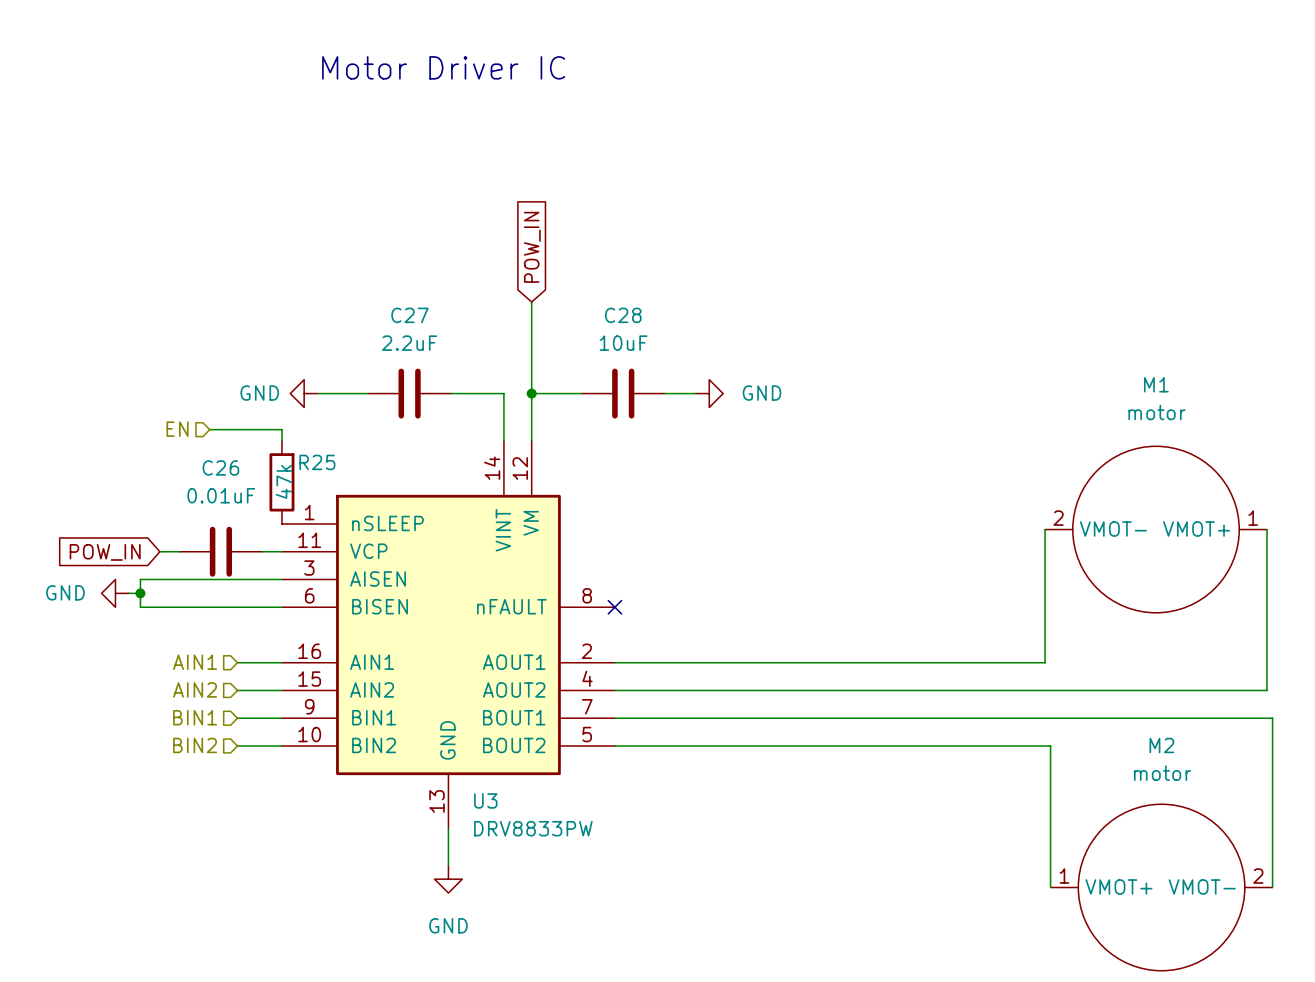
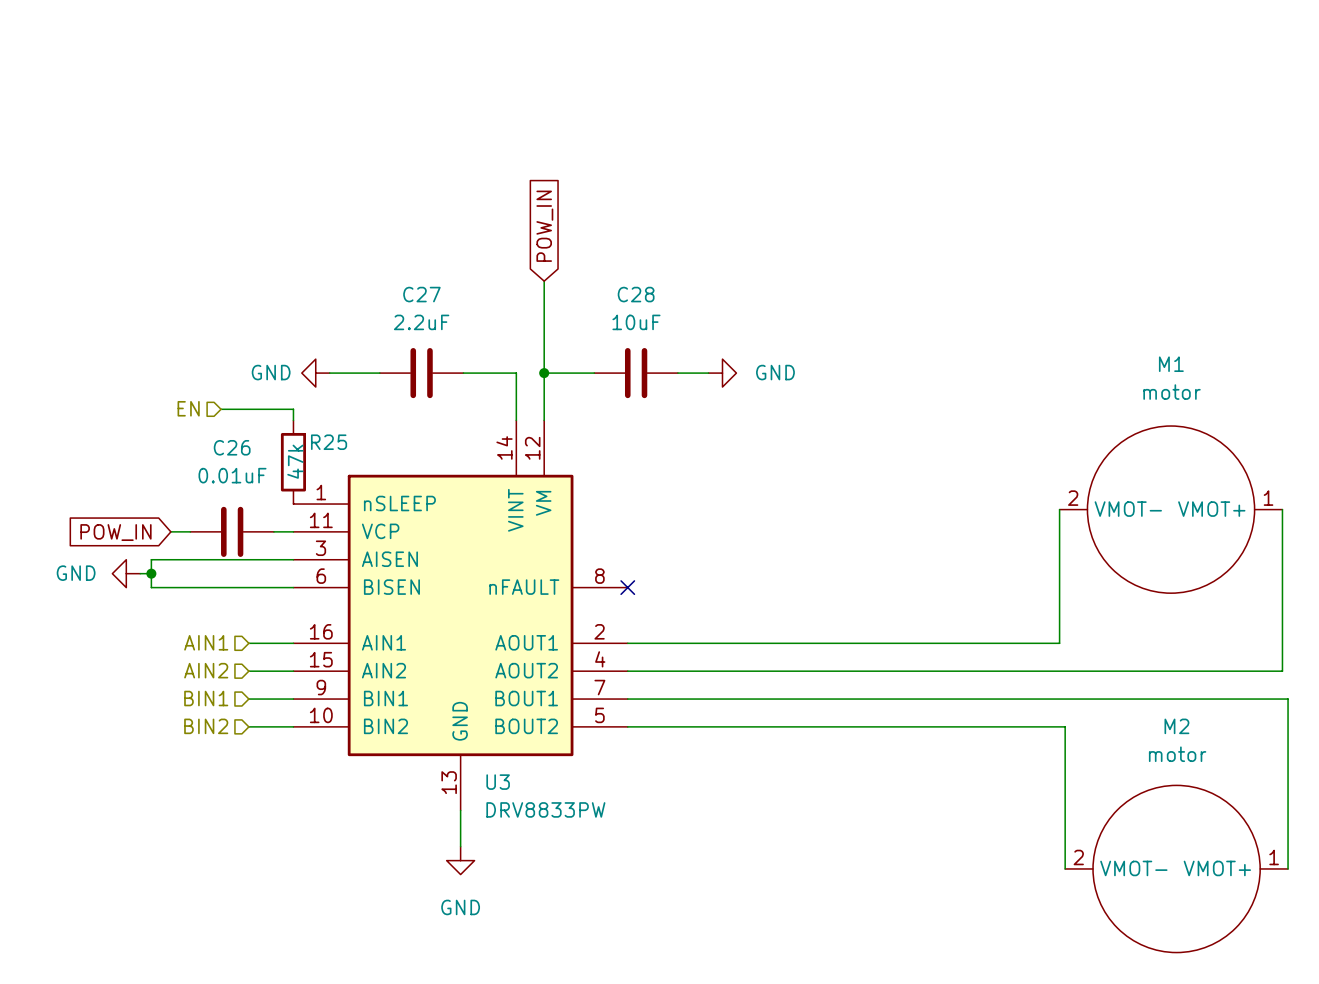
text: Motor Driver IC (443, 67) -> none
M2 rotation: 0° (1161, 887) -> 180° (1176, 868)

